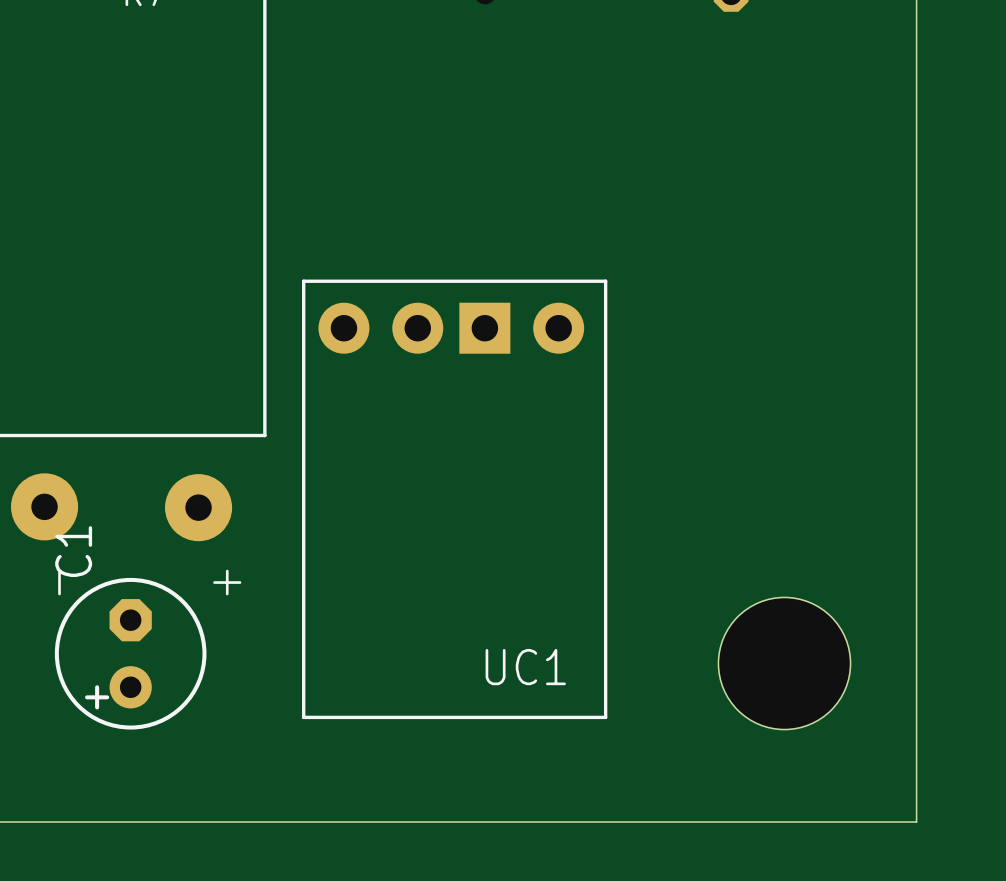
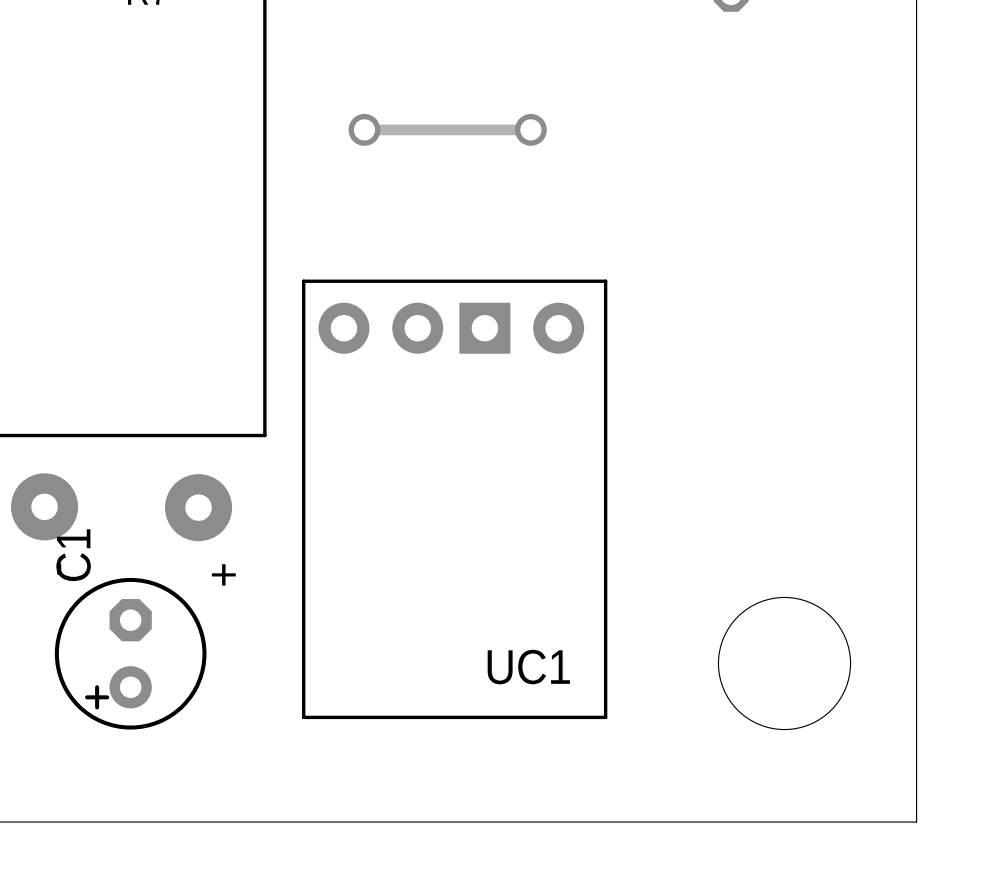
track: none -> (364, 129) (530, 129)
via: none -> (364, 129)
via: none -> (530, 129)

